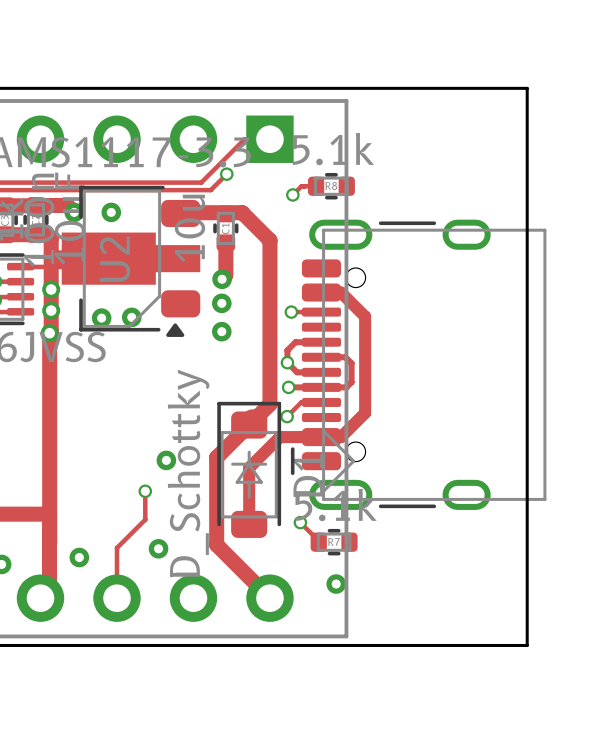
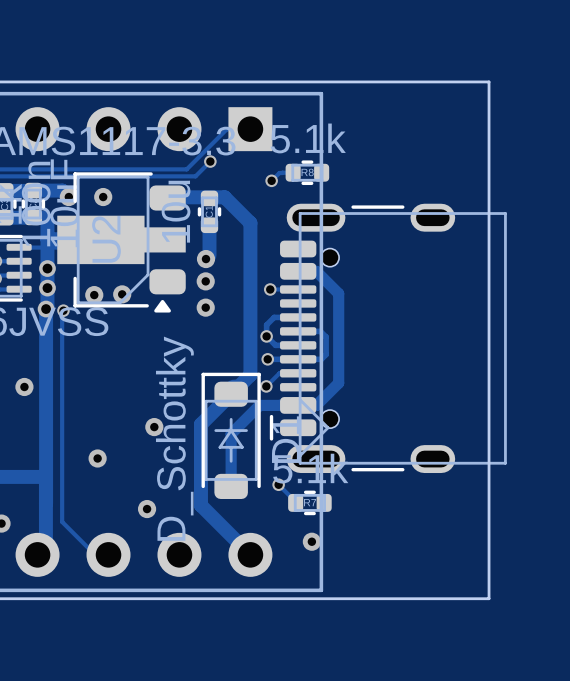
via: none -> (24, 386)
track: (145, 491) (145, 519) (116, 547) (116, 598) -> (63, 310) (62, 521) (95, 554) (108, 554)
via position: (145, 491) -> (63, 310)
via position: (79, 557) -> (97, 458)

